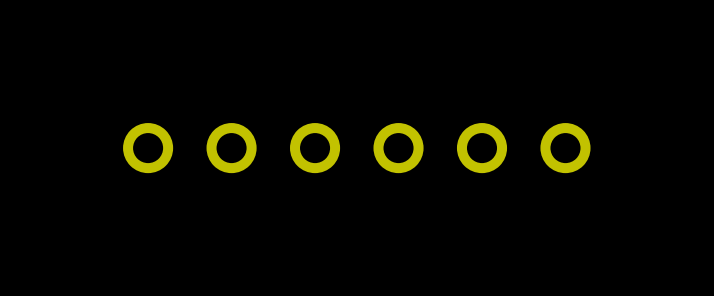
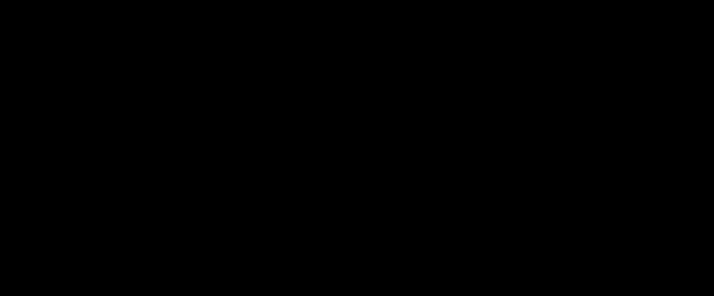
part: (356, 148) -> none

